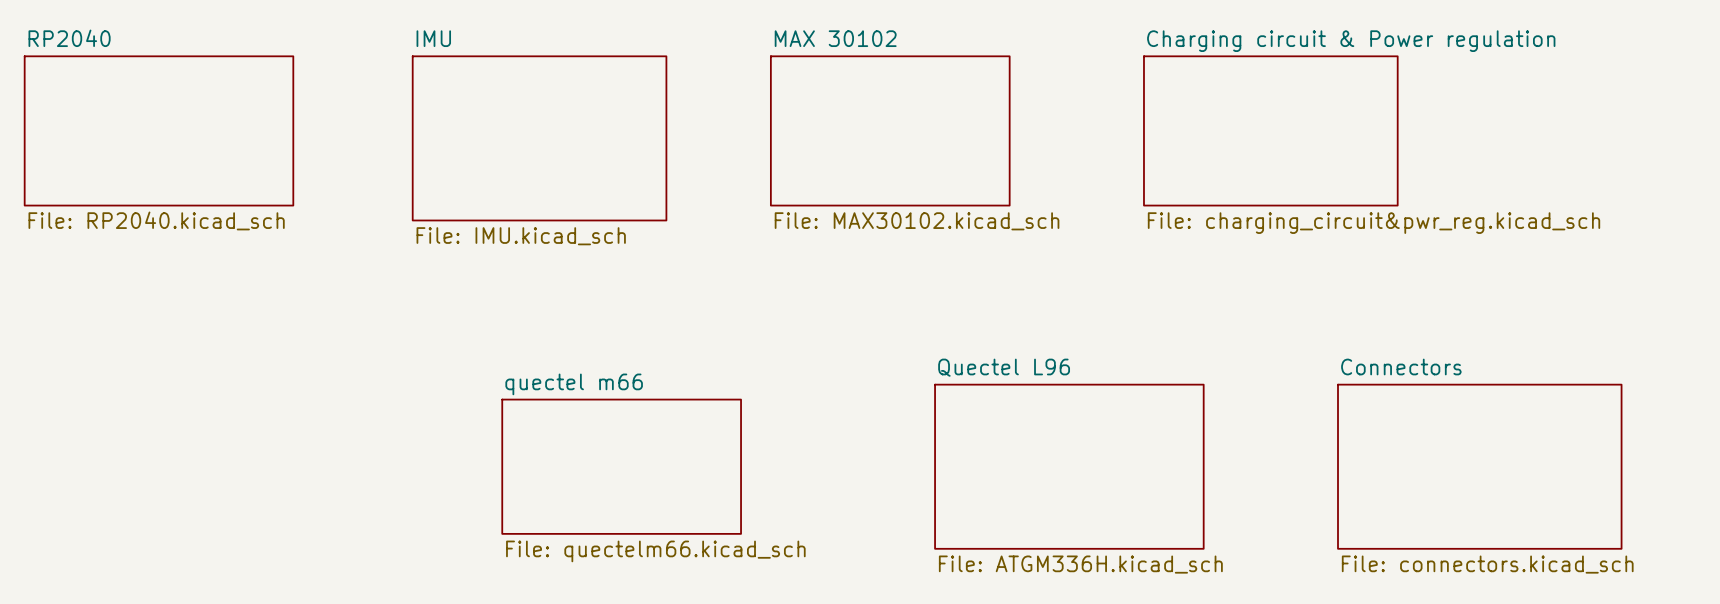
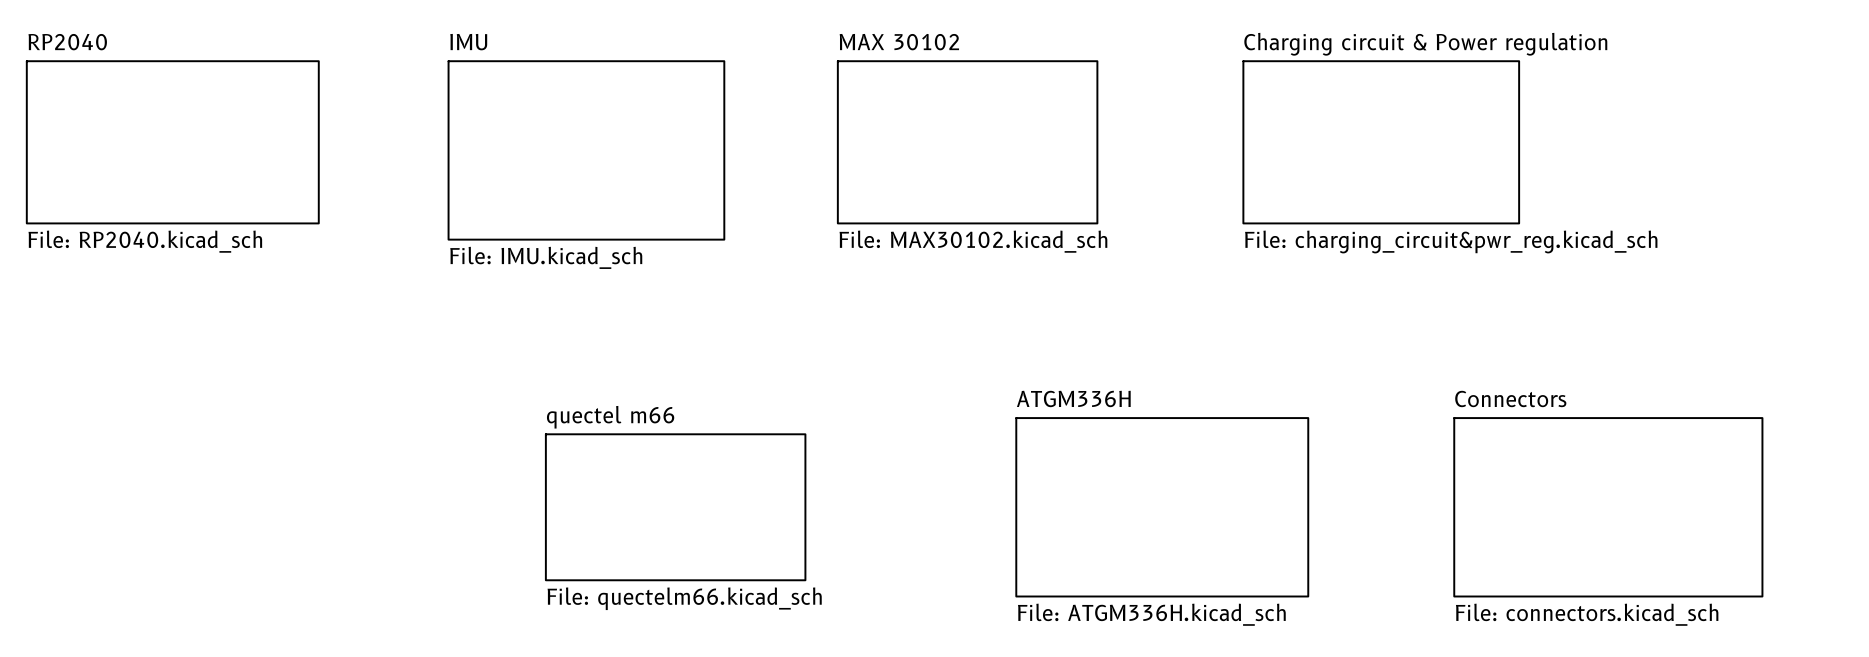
sheet Quectel L96 name: Quectel L96 (1004, 367) -> ATGM336H (1073, 398)

